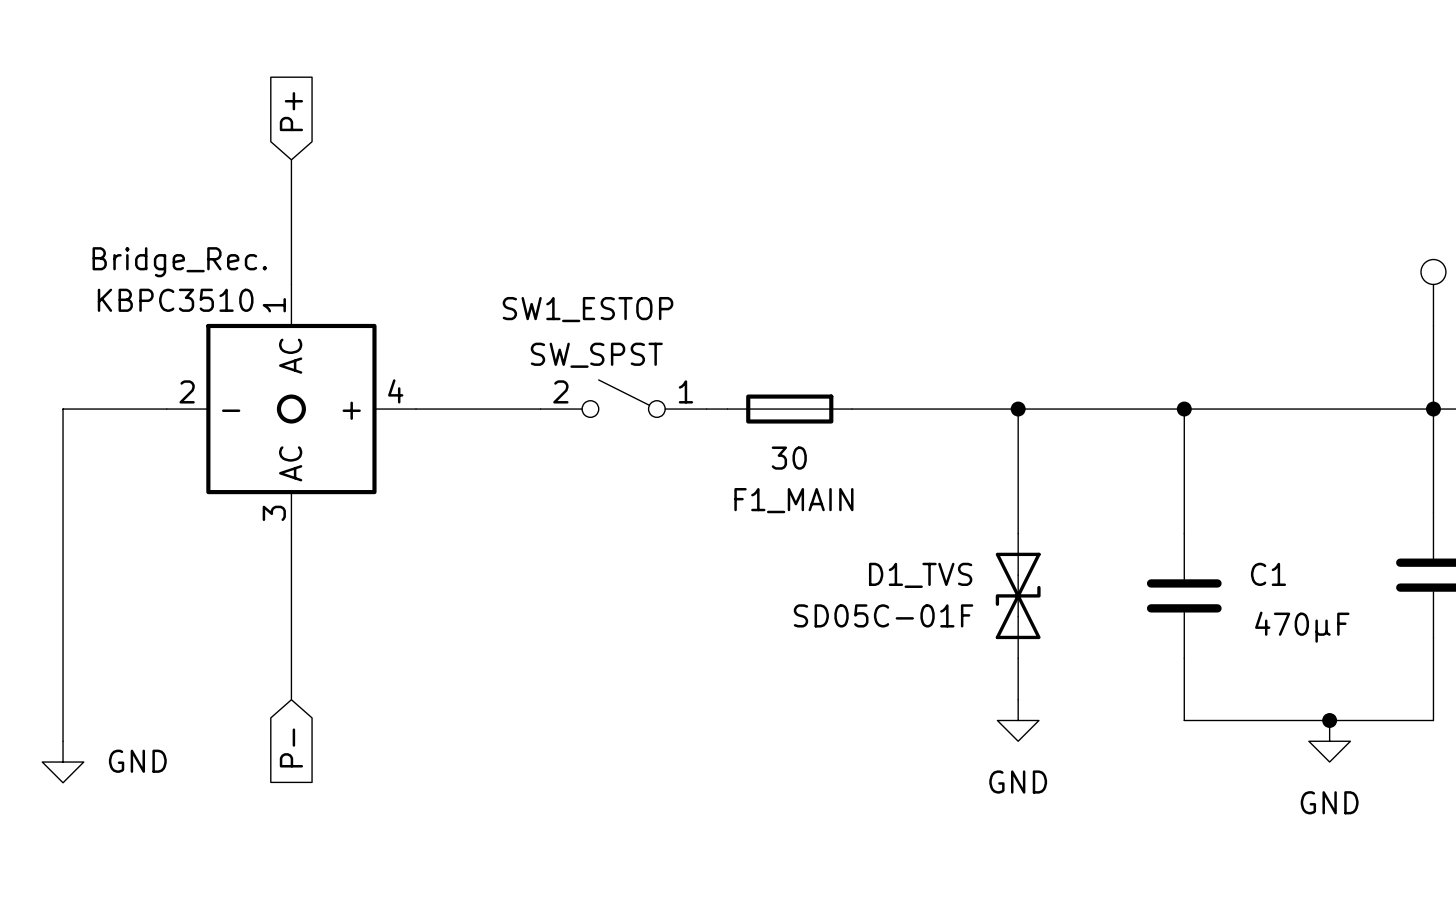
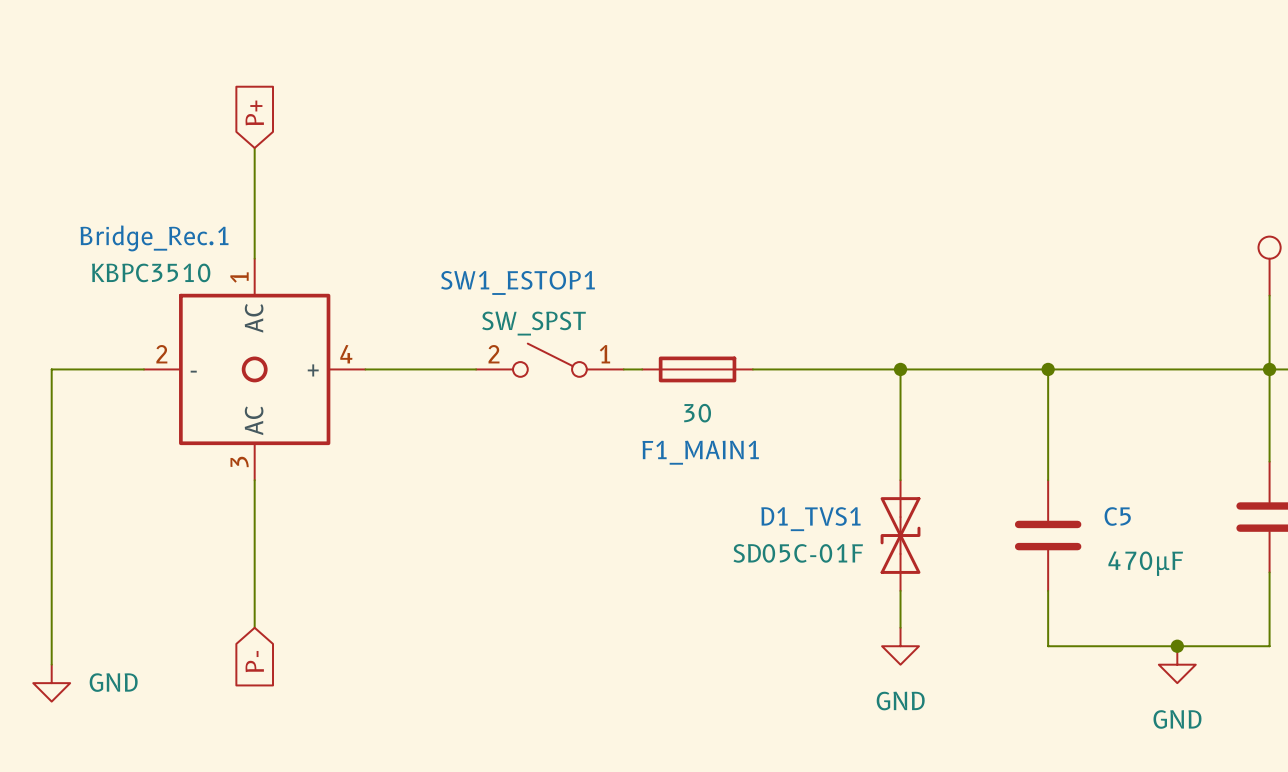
Bridge_Rec. name: Bridge_Rec. (179, 262) -> Bridge_Rec.1 (154, 238)
SW1_ESTOP name: SW1_ESTOP (588, 309) -> SW1_ESTOP1 (517, 282)
F1_MAIN name: F1_MAIN (793, 500) -> F1_MAIN1 (700, 452)
C1 name: C1 (1268, 574) -> C5 (1117, 516)
D1_TVS name: D1_TVS (920, 575) -> D1_TVS1 (810, 519)

